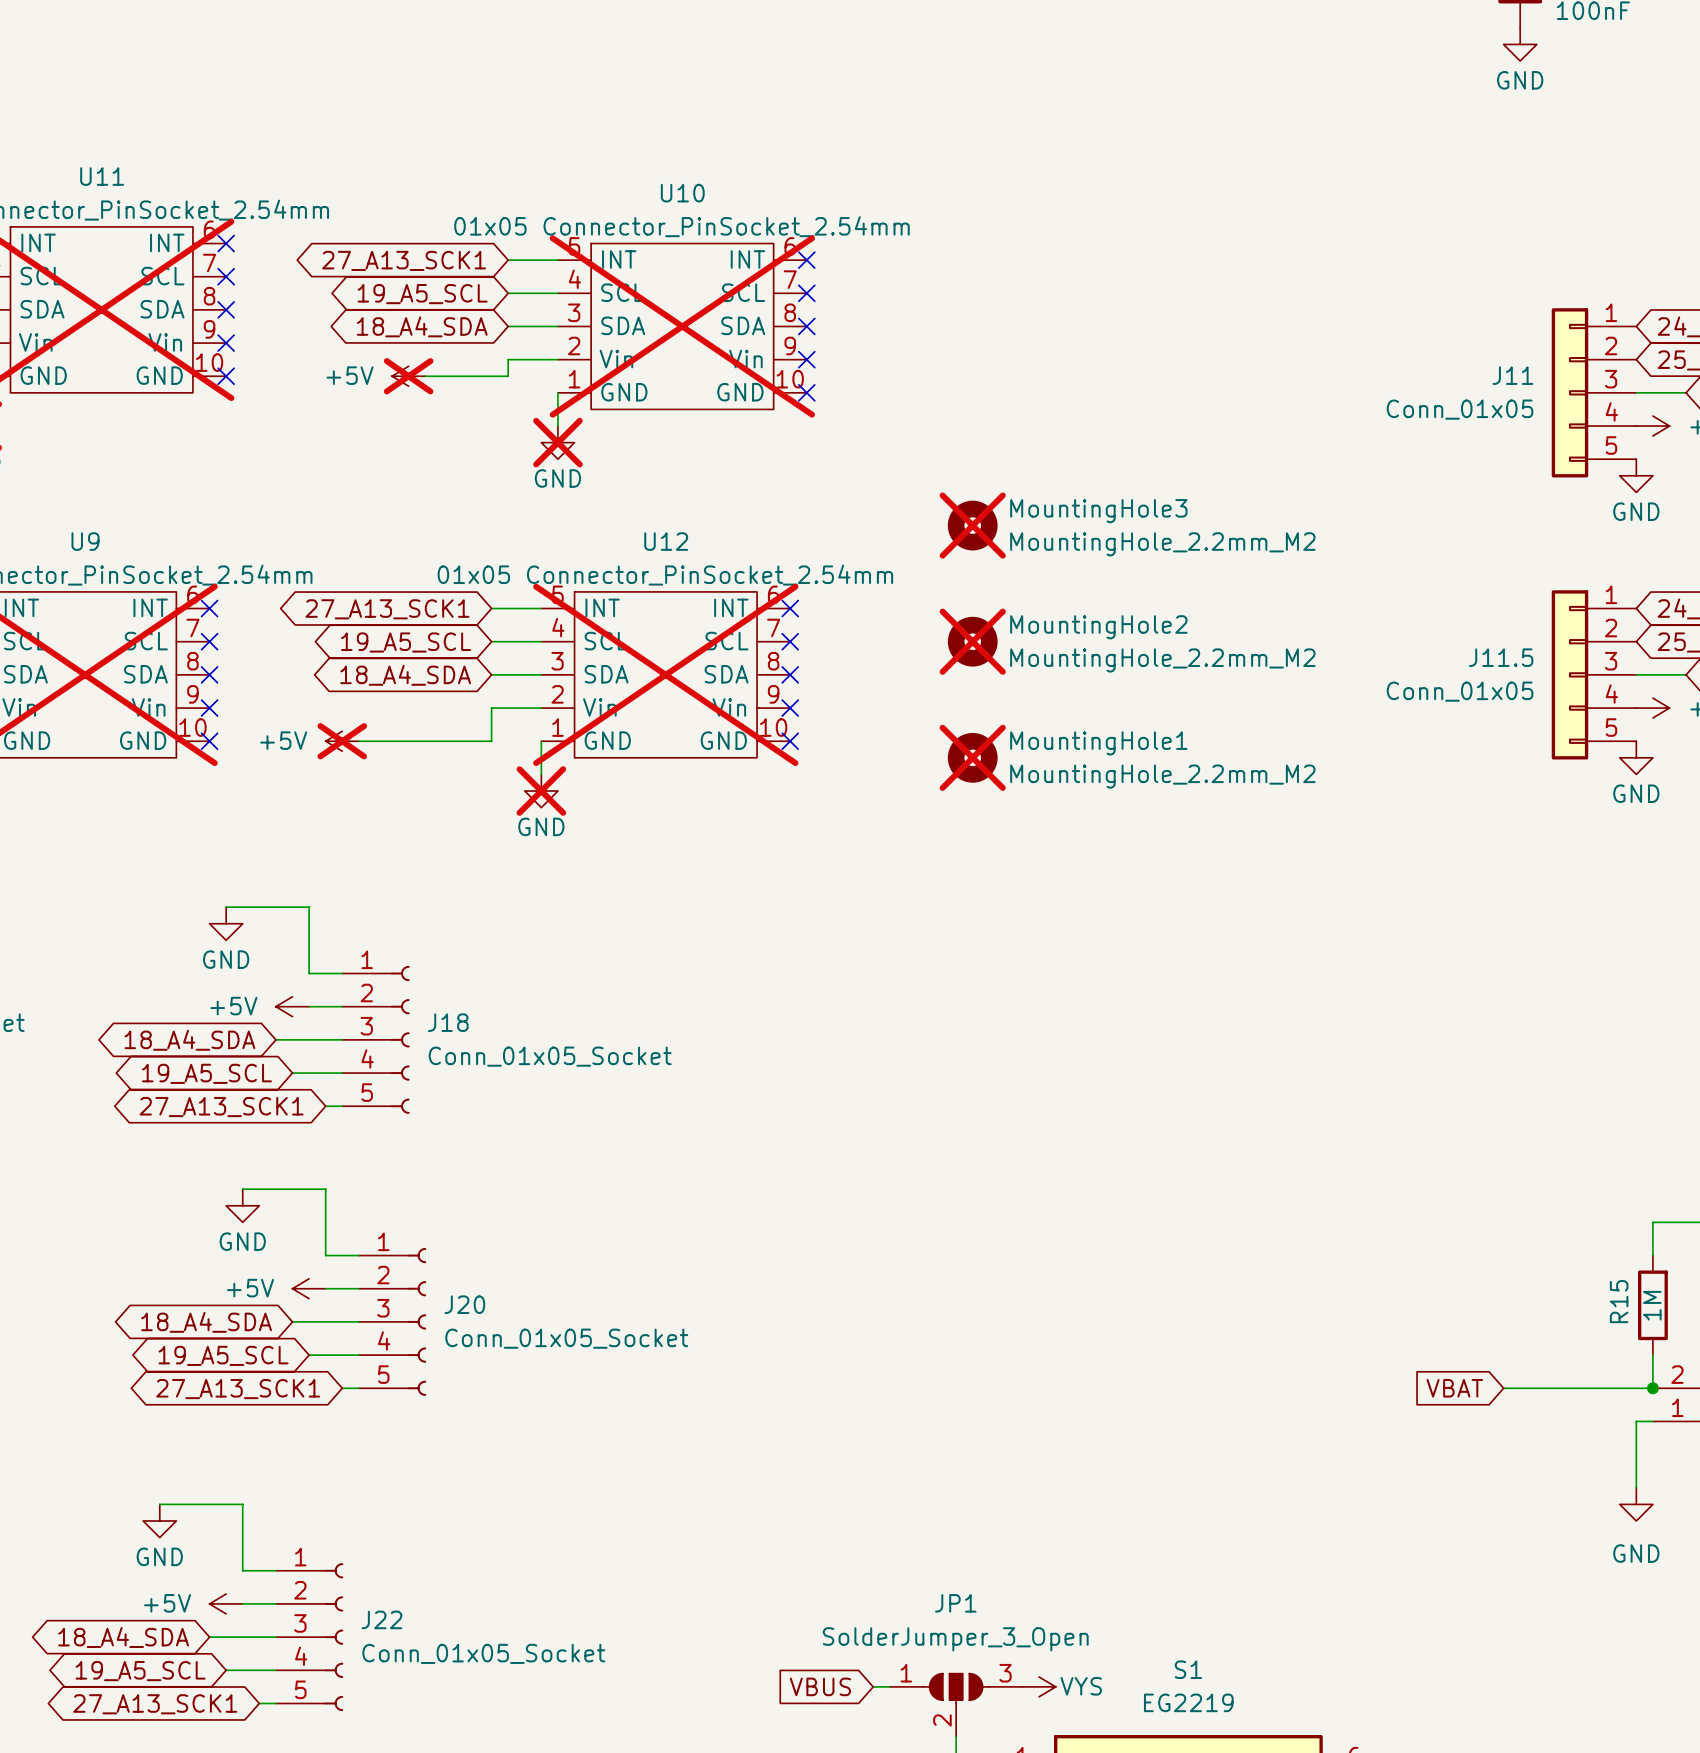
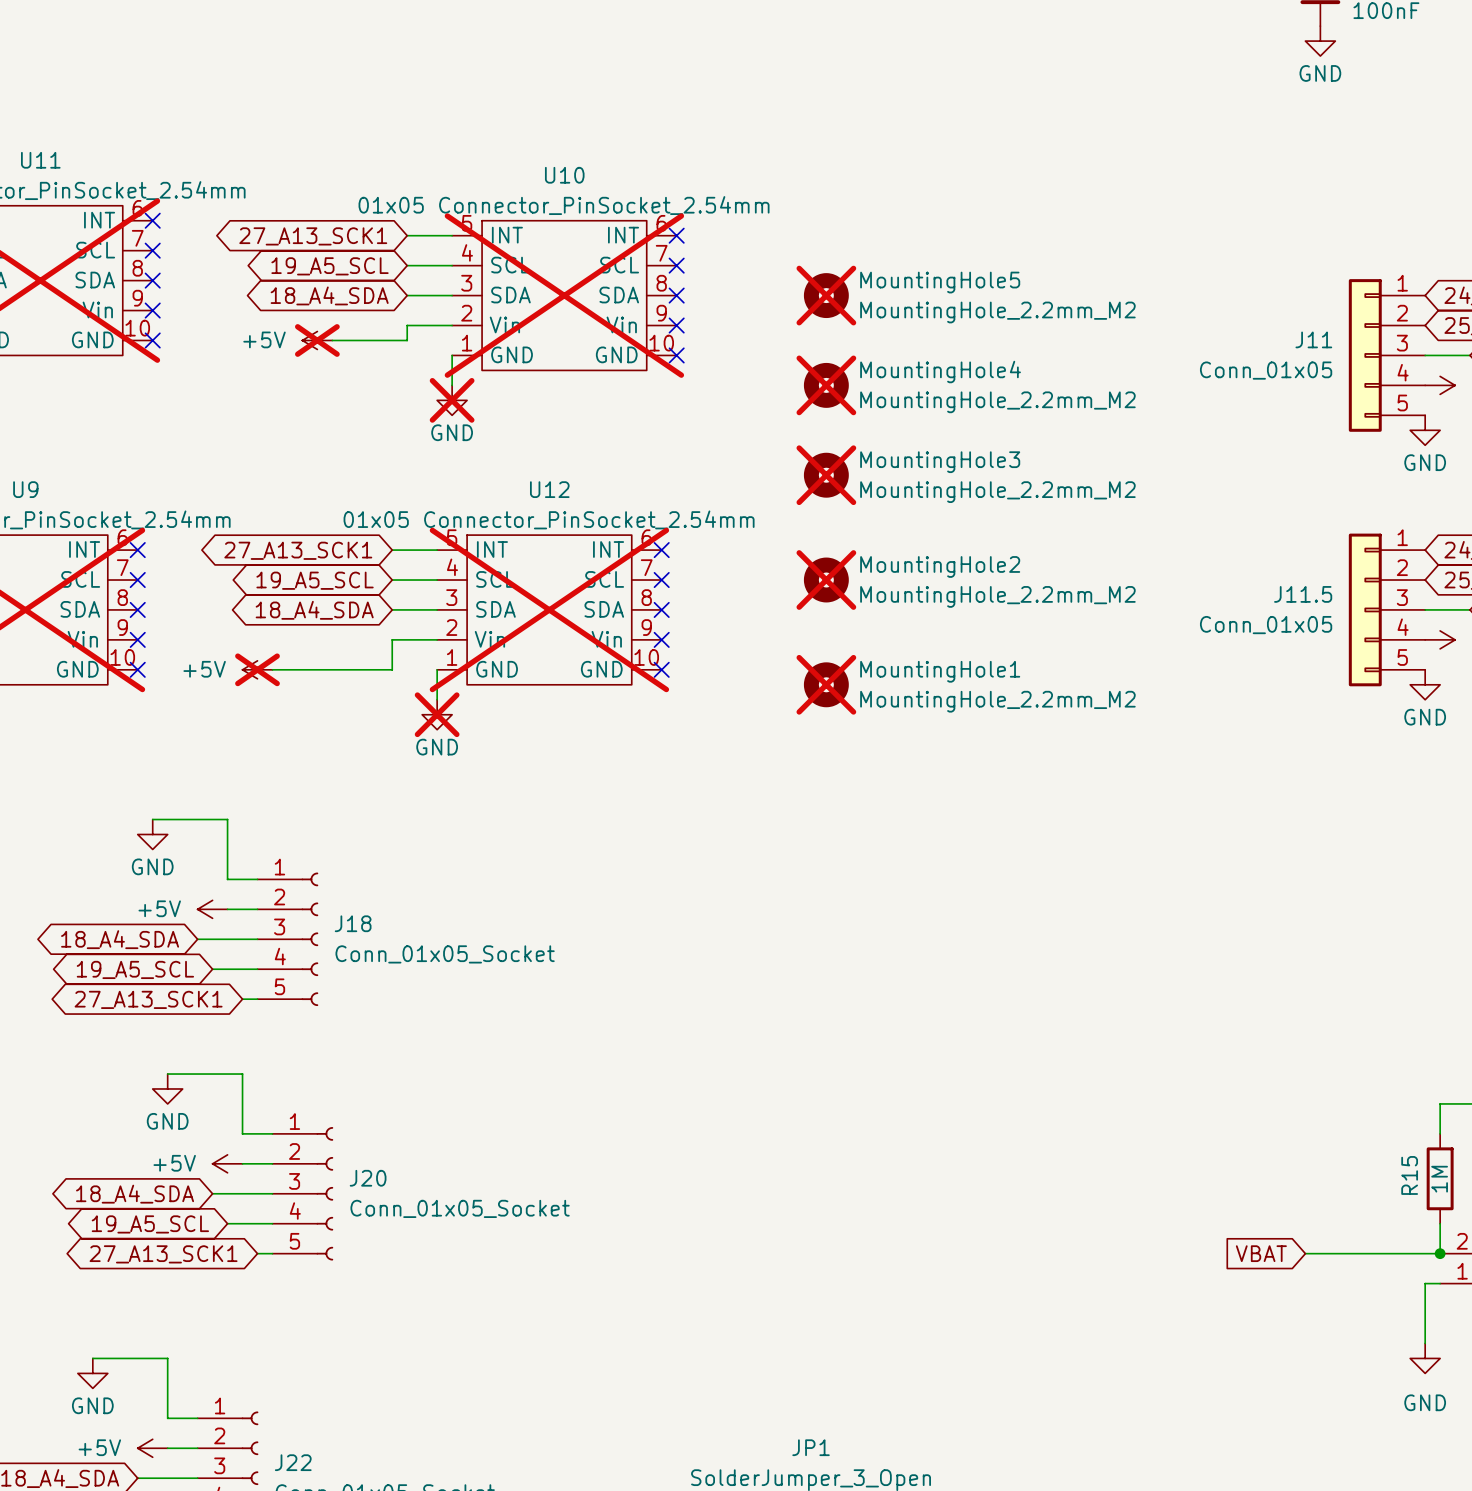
MountingHole5: none -> MountingHole_2.2mm_M2 (826, 295)
MountingHole4: none -> MountingHole_2.2mm_M2 (826, 385)

